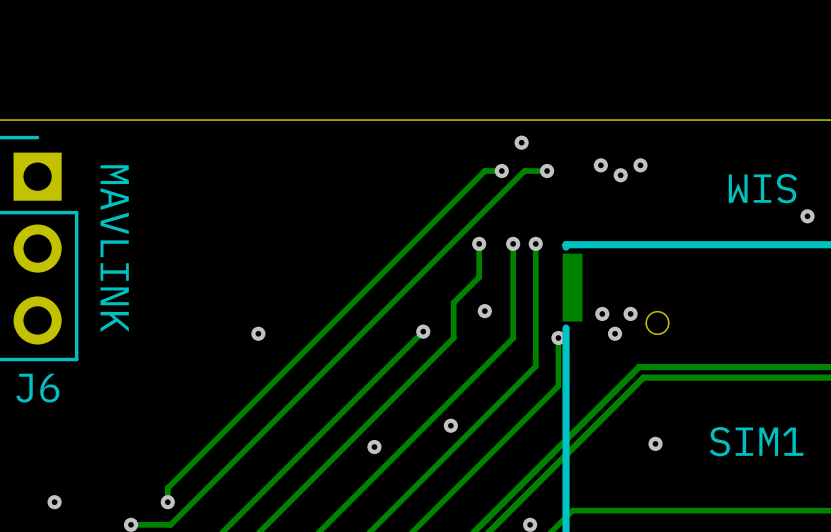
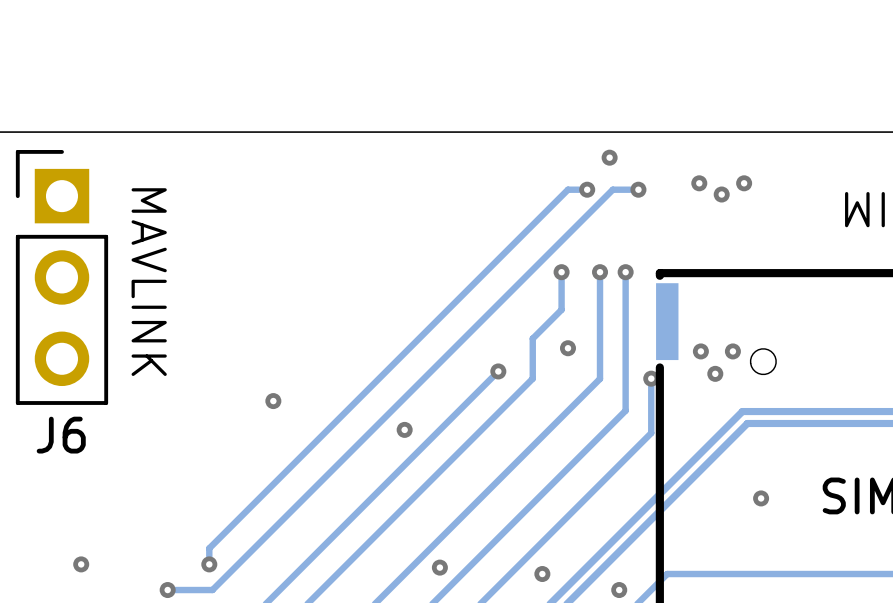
via position: (258, 333) -> (273, 401)
via: none -> (404, 429)
via: (450, 425) -> none
via: (374, 446) -> none
via: none -> (439, 567)
via: none -> (542, 574)

